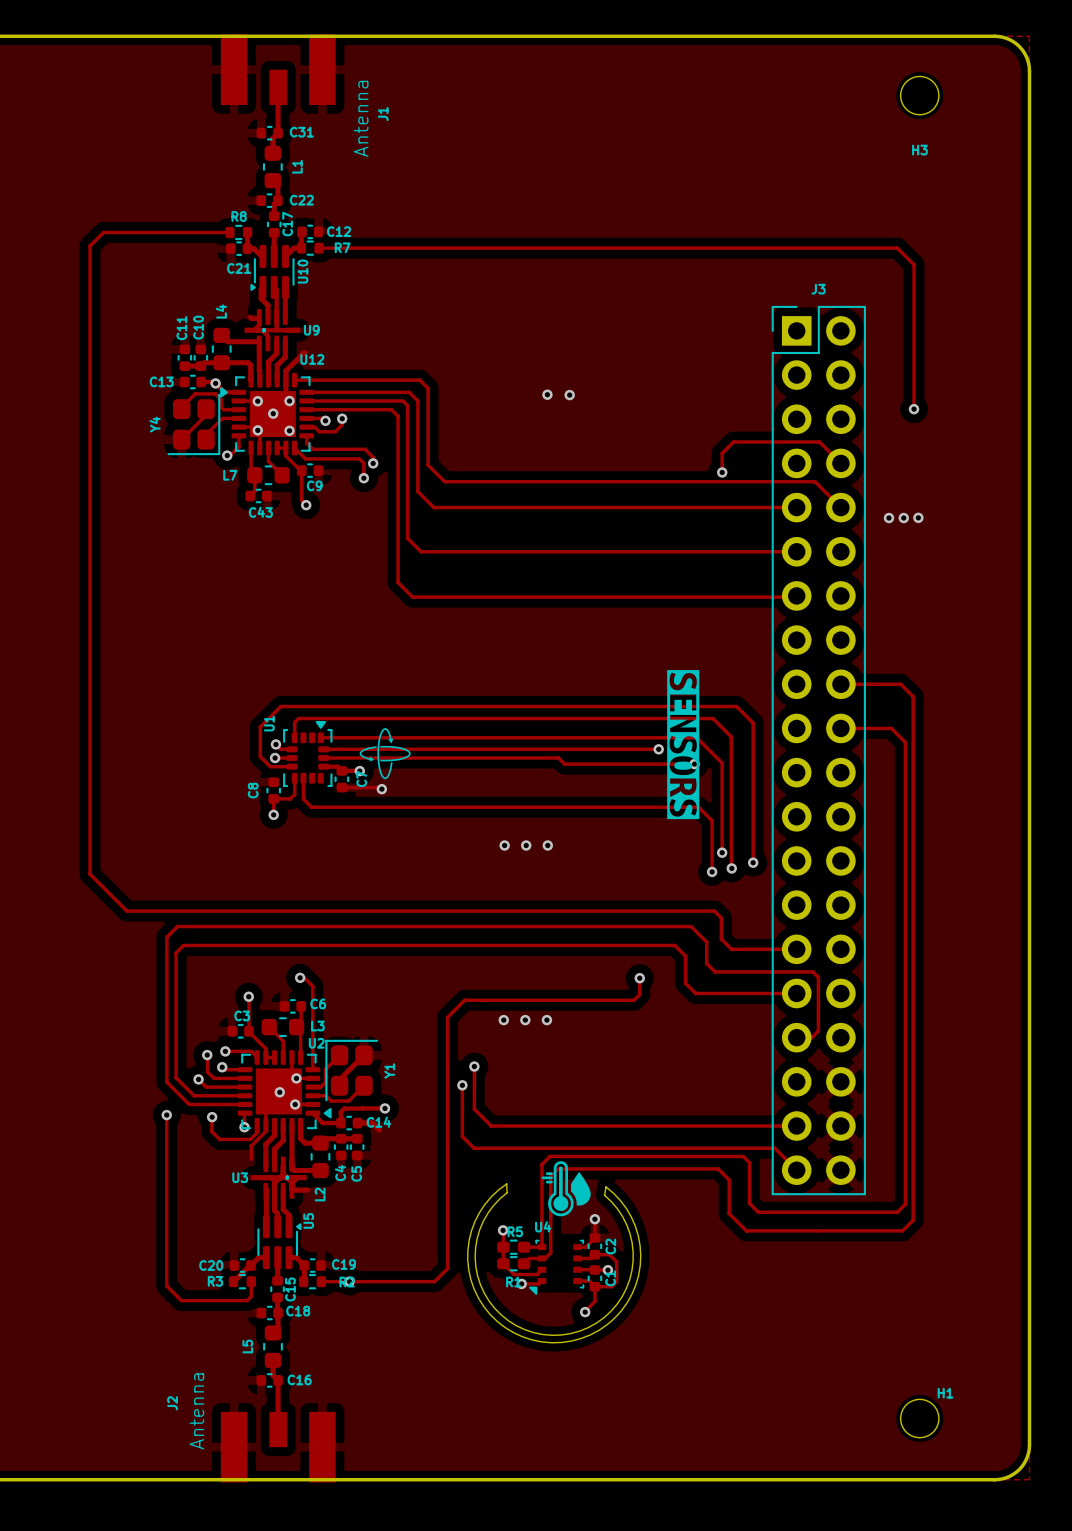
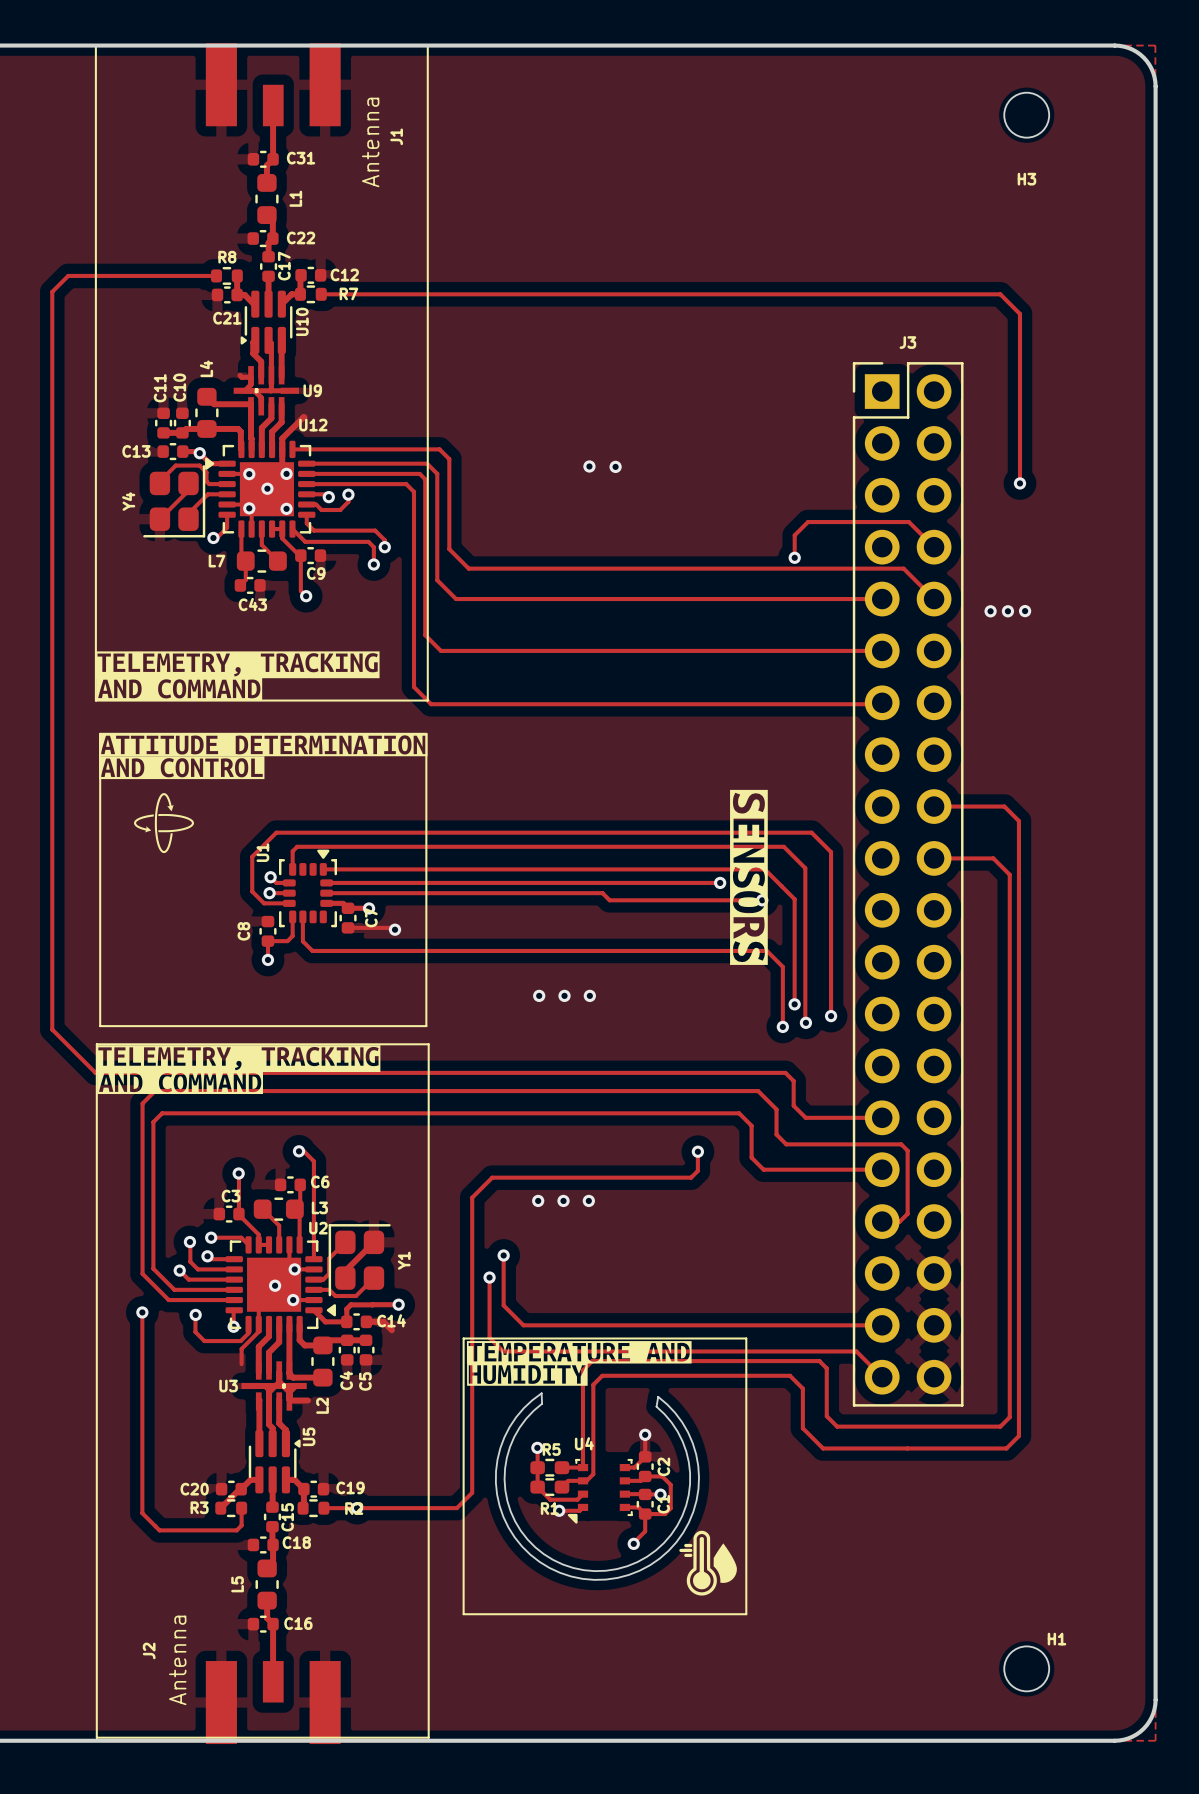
line: none -> (95, 45) (427, 45) (427, 700) (95, 700) (95, 45)
drawing: none -> [95, 651, 380, 701]
drawing: none -> [99, 733, 428, 780]
line: none -> (100, 733) (426, 733) (426, 1026) (100, 1026) (100, 733)
drawing position: (385, 753) -> (163, 823)
line: none -> (96, 1044) (428, 1044) (428, 1737) (96, 1737) (96, 1044)
drawing: none -> [96, 1045, 381, 1095]
line: none -> (463, 1338) (746, 1338) (746, 1614) (463, 1614) (463, 1338)
drawing: none -> [466, 1341, 692, 1386]
drawing position: (566, 1188) -> (708, 1563)

